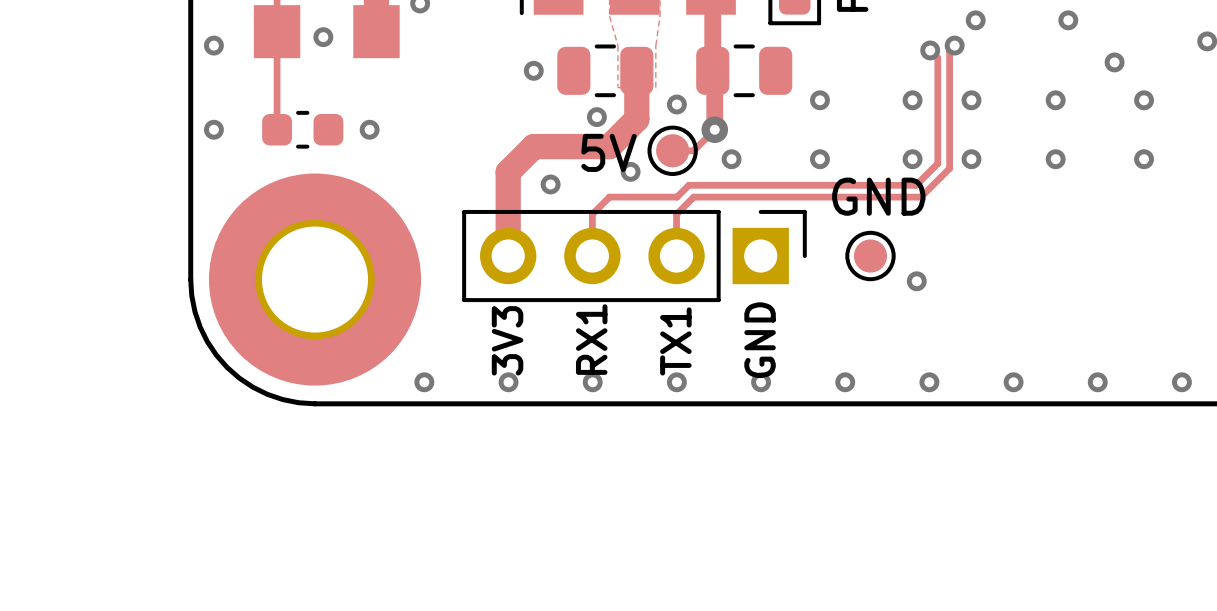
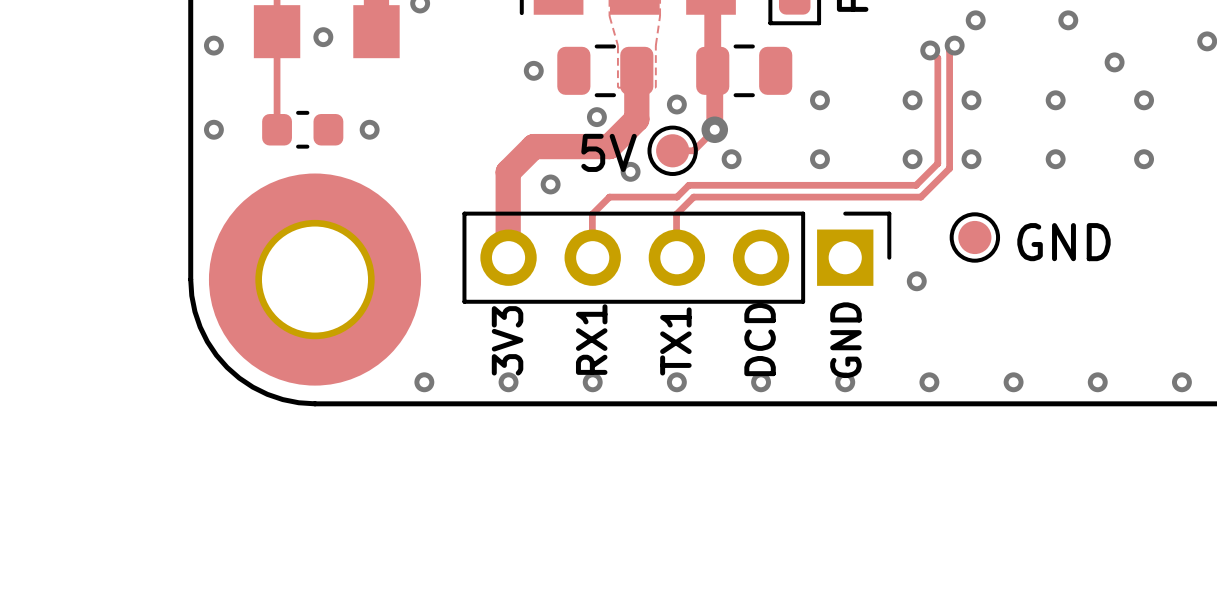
text: GND (878, 196) -> none
text: none -> GND (1063, 242)
part: (634, 256) -> none
part position: (870, 256) -> (974, 237)
part: none -> (676, 257)
text: GND (760, 340) -> DCD (760, 339)
text: none -> GND (845, 340)

